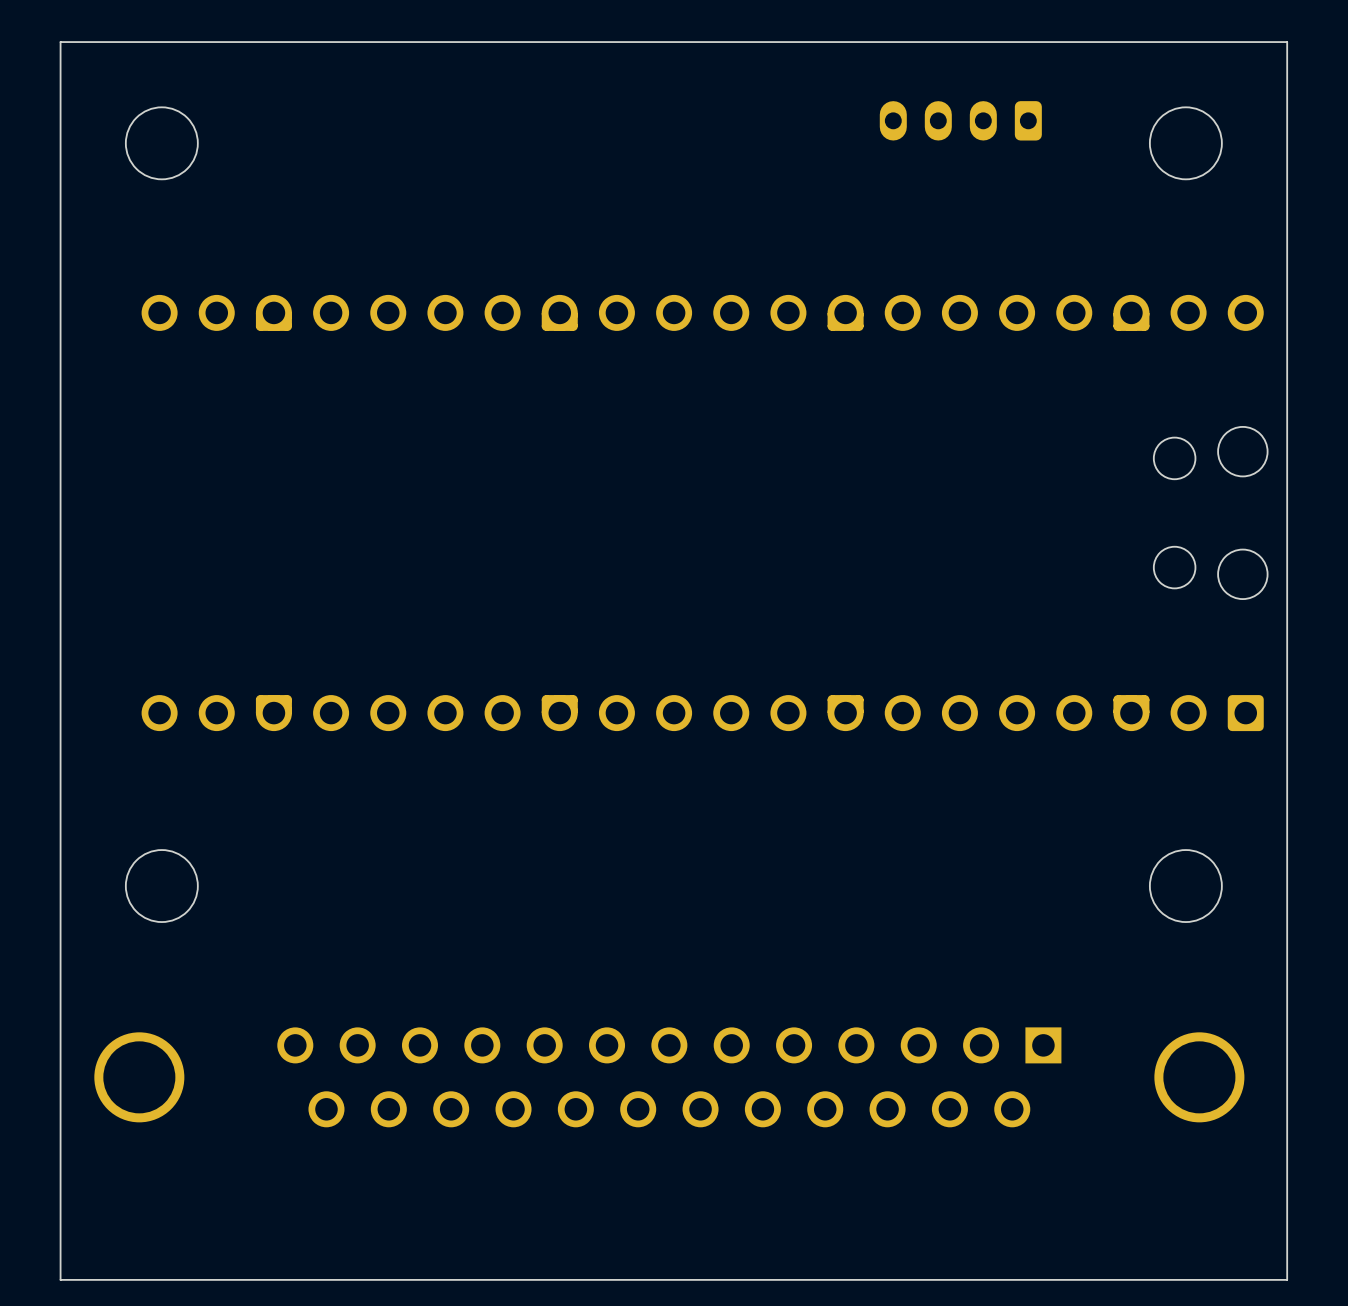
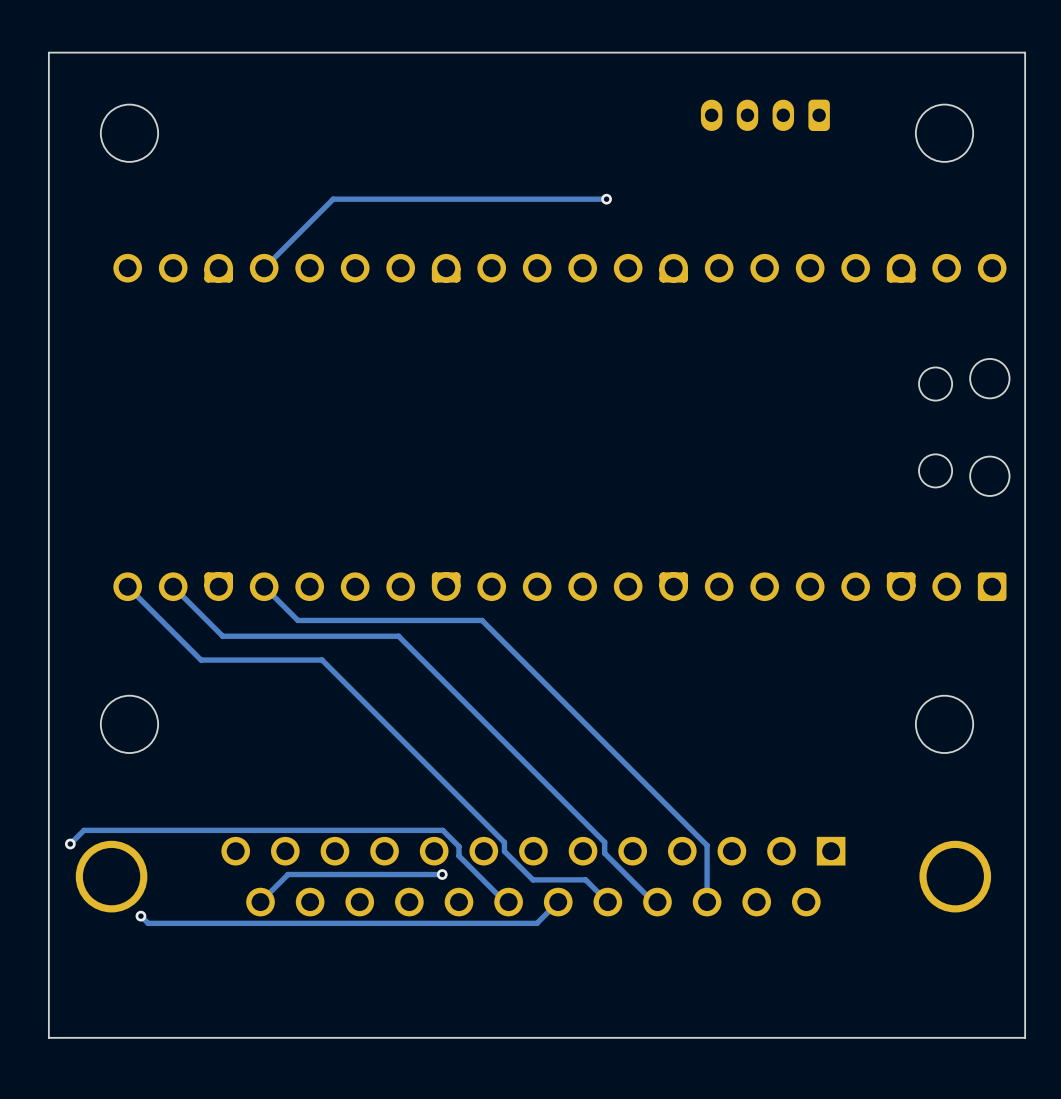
track: none -> (606, 199) (333, 199) (264, 268)
via: none -> (606, 199)
track: none -> (127, 586) (201, 660) (322, 660) (504, 842) (504, 851) (532, 879) (585, 879) (607, 902)
track: none -> (173, 586) (222, 636) (398, 636) (604, 842) (604, 853) (653, 902) (657, 902)
track: none -> (264, 586) (297, 620) (482, 620) (707, 845) (707, 902)
track: none -> (70, 844) (83, 830) (442, 830) (458, 846) (458, 855) (505, 902) (508, 902)
via: none -> (70, 844)
track: none -> (442, 874) (288, 874) (260, 902)
via: none -> (442, 874)
track: none -> (558, 902) (536, 923) (148, 923) (140, 916)
via: none -> (140, 916)

